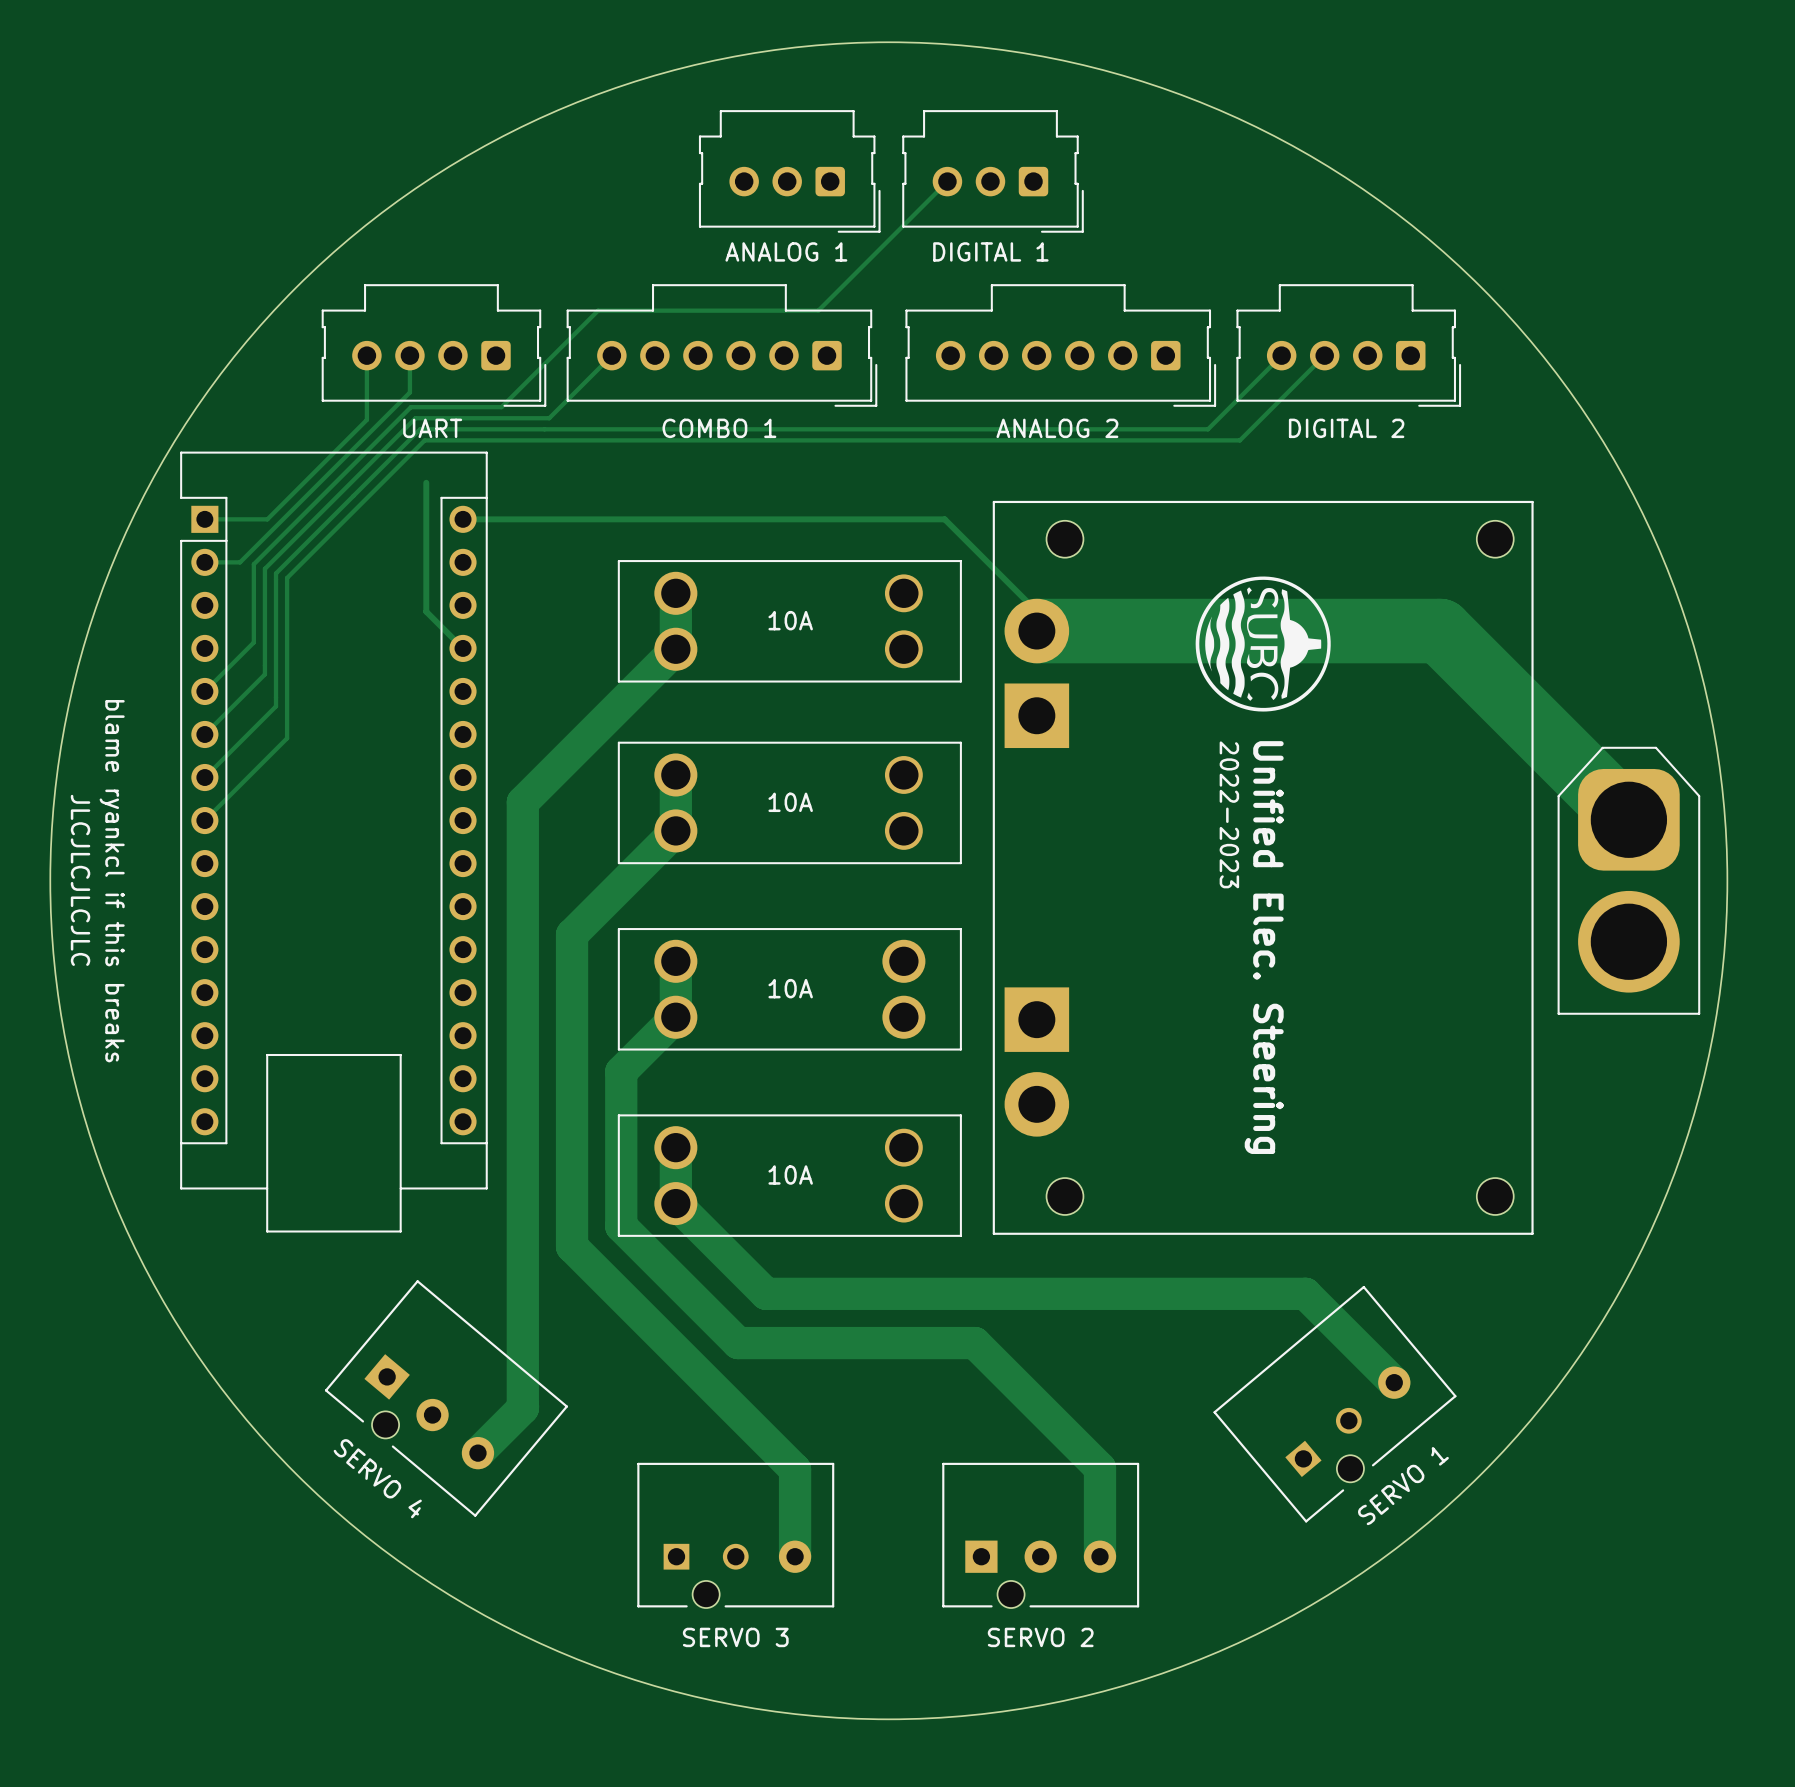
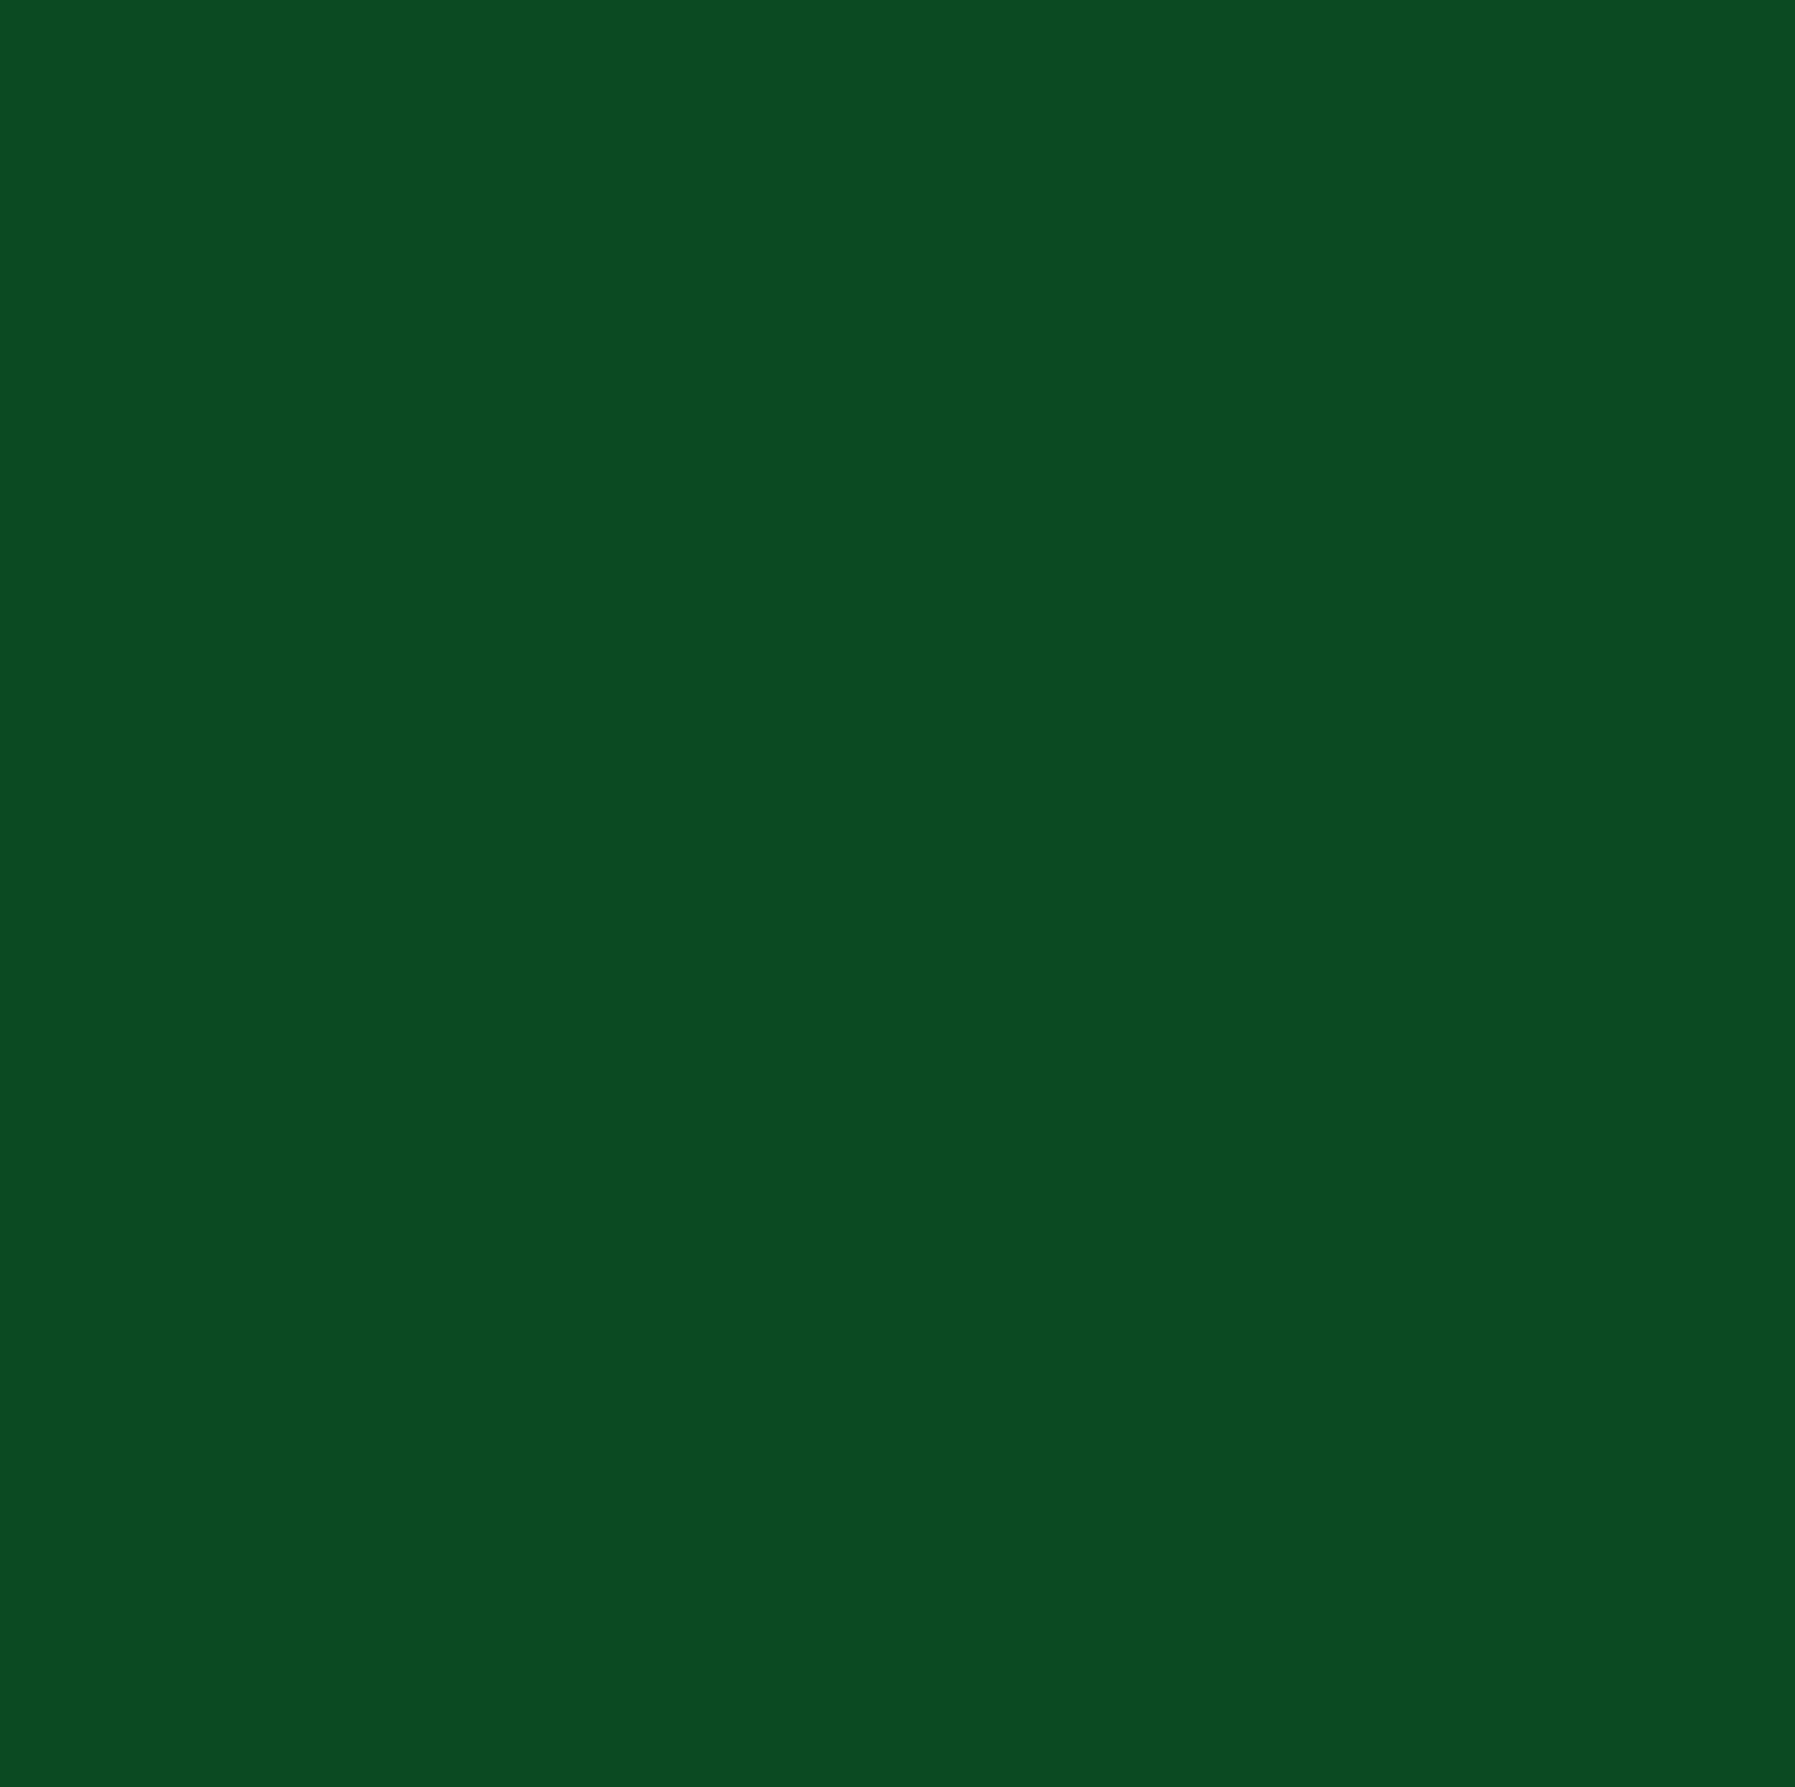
round board edge: [49, 41, 1729, 1721] -> none
part: (789, 171) -> none
part: (993, 171) -> none
track: (947, 181) (818, 310) (598, 310) (501, 407) (410, 407) (253, 564) (253, 642) (204, 691) -> none
text: ANALOG 1 (786, 251) -> none
text: DIGITAL 1 (990, 251) -> none
part: (433, 345) -> none
part: (721, 345) -> none
part: (1060, 345) -> none
part: (1348, 345) -> none
track: (366, 355) (366, 419) (267, 519) (204, 519) -> none
track: (409, 355) (409, 392) (240, 562) (204, 562) -> none
track: (611, 355) (549, 418) (415, 418) (264, 568) (264, 674) (204, 734) -> none
track: (1281, 355) (1208, 429) (420, 429) (276, 573) (276, 706) (204, 777) -> none
track: (1324, 355) (1239, 440) (424, 440) (287, 578) (287, 738) (204, 820) -> none
text: UART (432, 428) -> none
text: COMBO 1 (719, 428) -> none
text: ANALOG 2 (1057, 428) -> none
text: DIGITAL 2 (1346, 428) -> none
track: (426, 482) (426, 611) (463, 648) -> none
track: (463, 519) (944, 519) (1036, 611) (1036, 631) (1440, 631) (1628, 819) -> none
drawing: [1195, 576, 1331, 712] -> none
track: (675, 593) (675, 649) (522, 802) (522, 1408) (477, 1453) -> none
text: 10A (790, 620) -> none
part: (789, 621) -> none
track: (675, 774) (675, 830) (572, 934) (572, 1246) (795, 1469) (795, 1556) -> none
part: (789, 802) -> none
text: 10A (790, 802) -> none
text: 2022-2023 (1229, 814) -> none
part: (333, 842) -> none
part: (1263, 867) -> none
text: JLCJLCJLCJLC (80, 880) -> none
part: (1628, 880) -> none
text: blame ryankcl if this breaks (112, 881) -> none
text: Unified Elec. Steering (1264, 947) -> none
track: (675, 961) (675, 1017) (621, 1071) (621, 1226) (738, 1343) (974, 1343) (1099, 1468) (1099, 1556) -> none
text: 10A (790, 988) -> none
part: (789, 989) -> none
track: (675, 1147) (675, 1203) (766, 1293) (1305, 1293) -> none
text: 10A (790, 1174) -> none
part: (789, 1175) -> none
track: (1305, 1293) (1394, 1382) -> none
part: (446, 1398) -> none
part: (1334, 1404) -> none
text: SERVO 4 (377, 1478) -> none
text: SERVO 1 (1403, 1486) -> none
part: (735, 1535) -> none
part: (1040, 1535) -> none
text: SERVO 3 (735, 1637) -> none
text: SERVO 2 (1040, 1637) -> none

